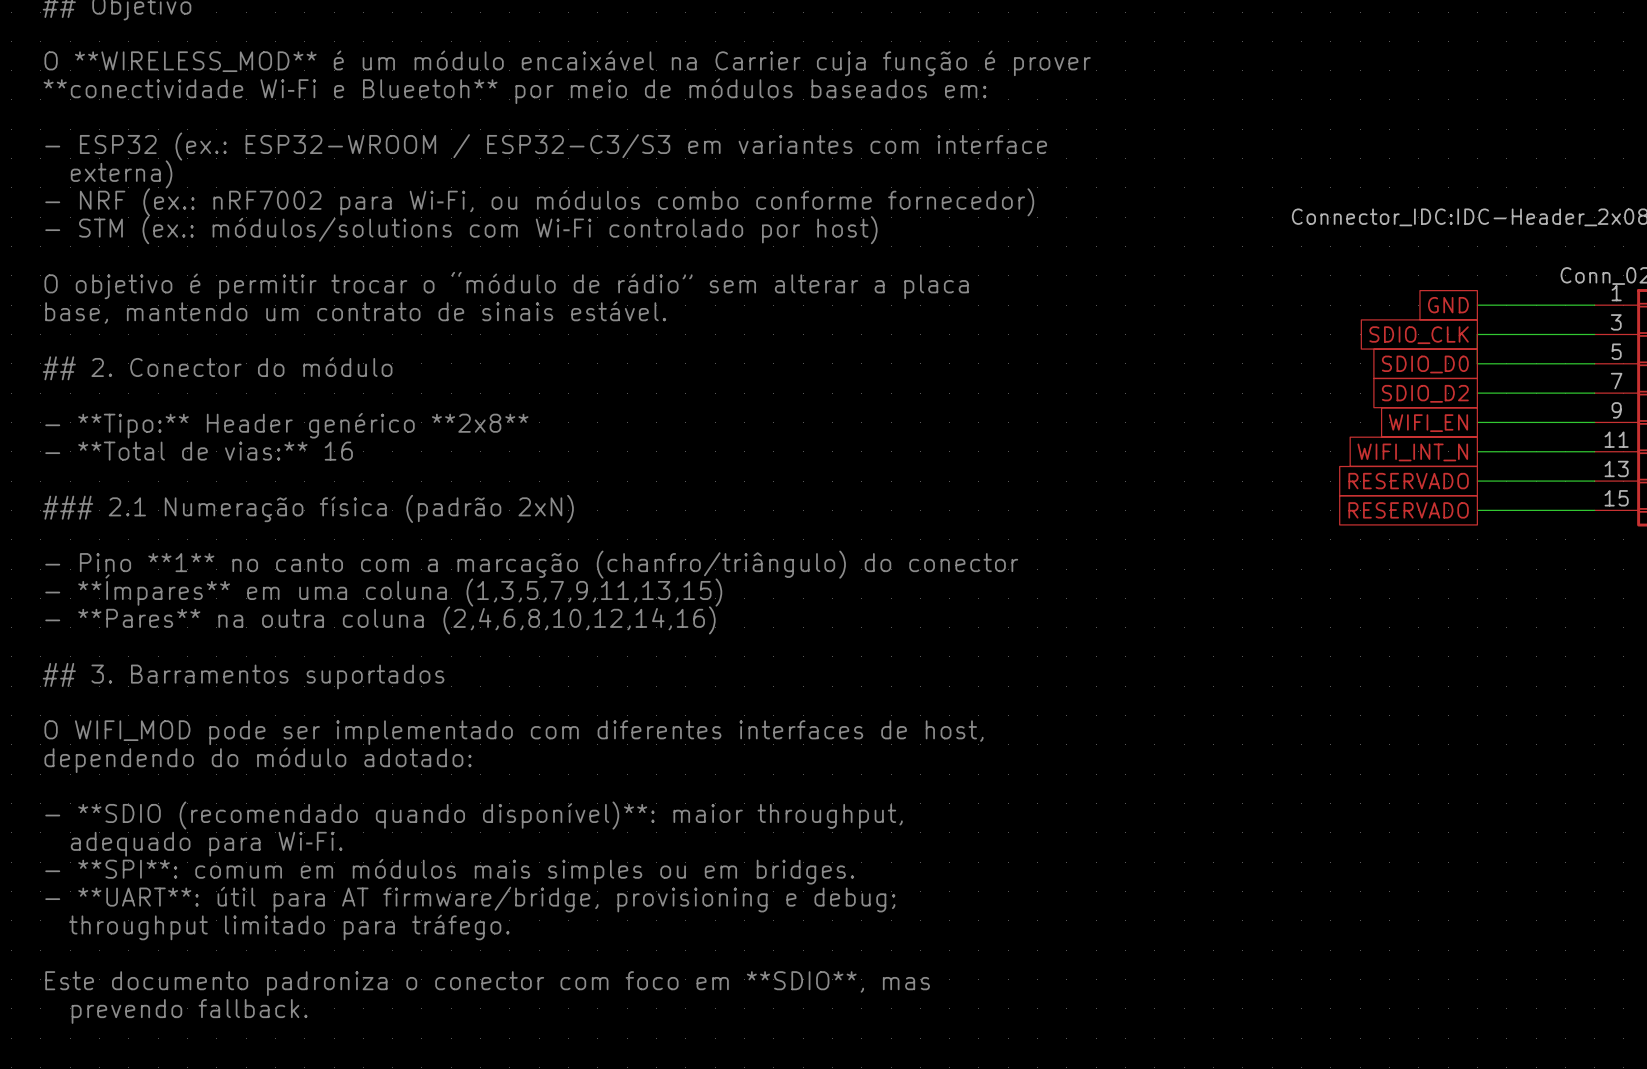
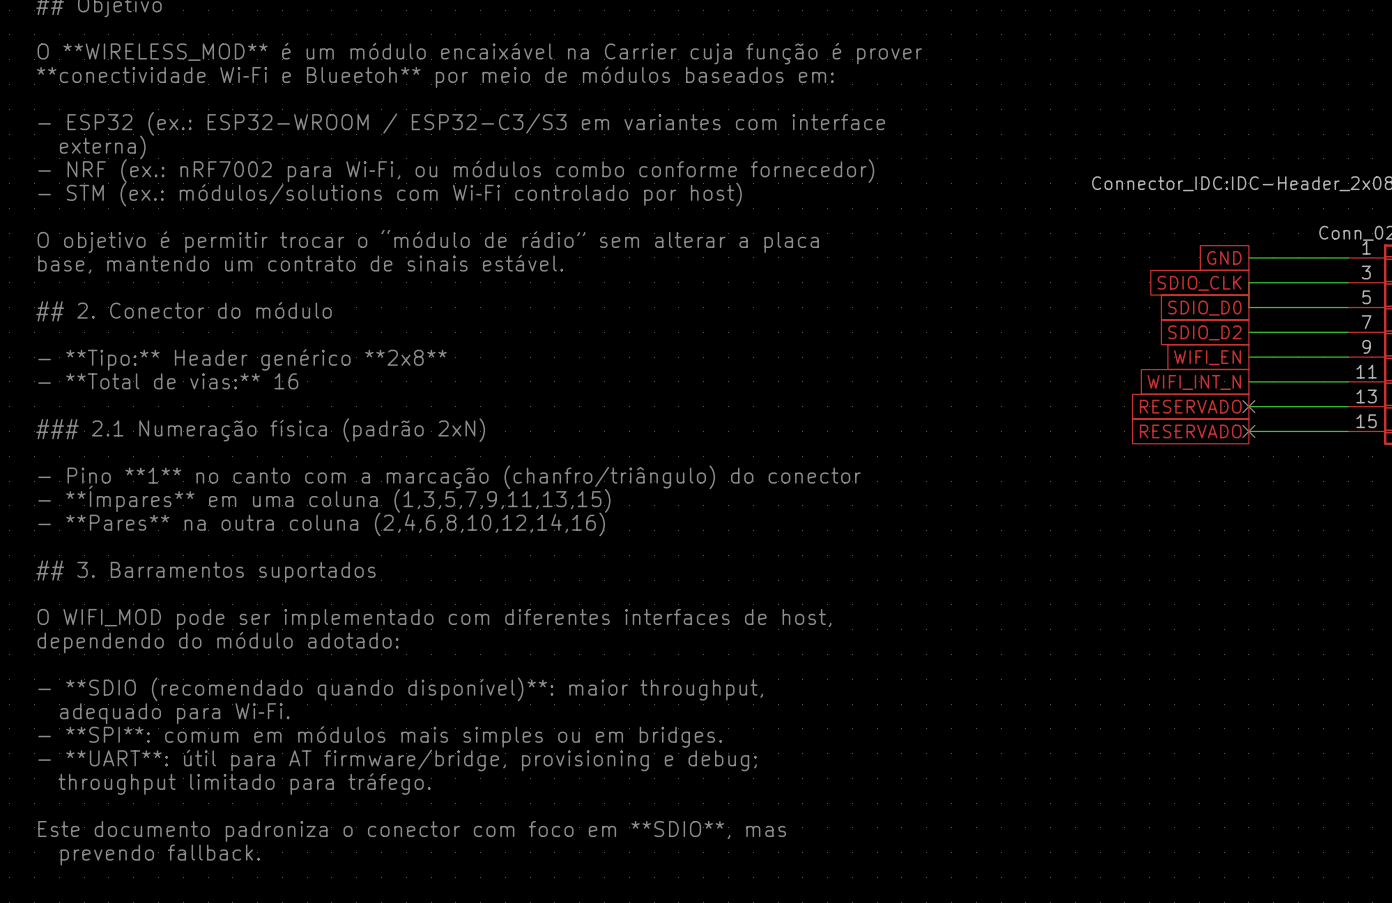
no-connect mark: none -> (1248, 406)
no-connect mark: none -> (1248, 431)

